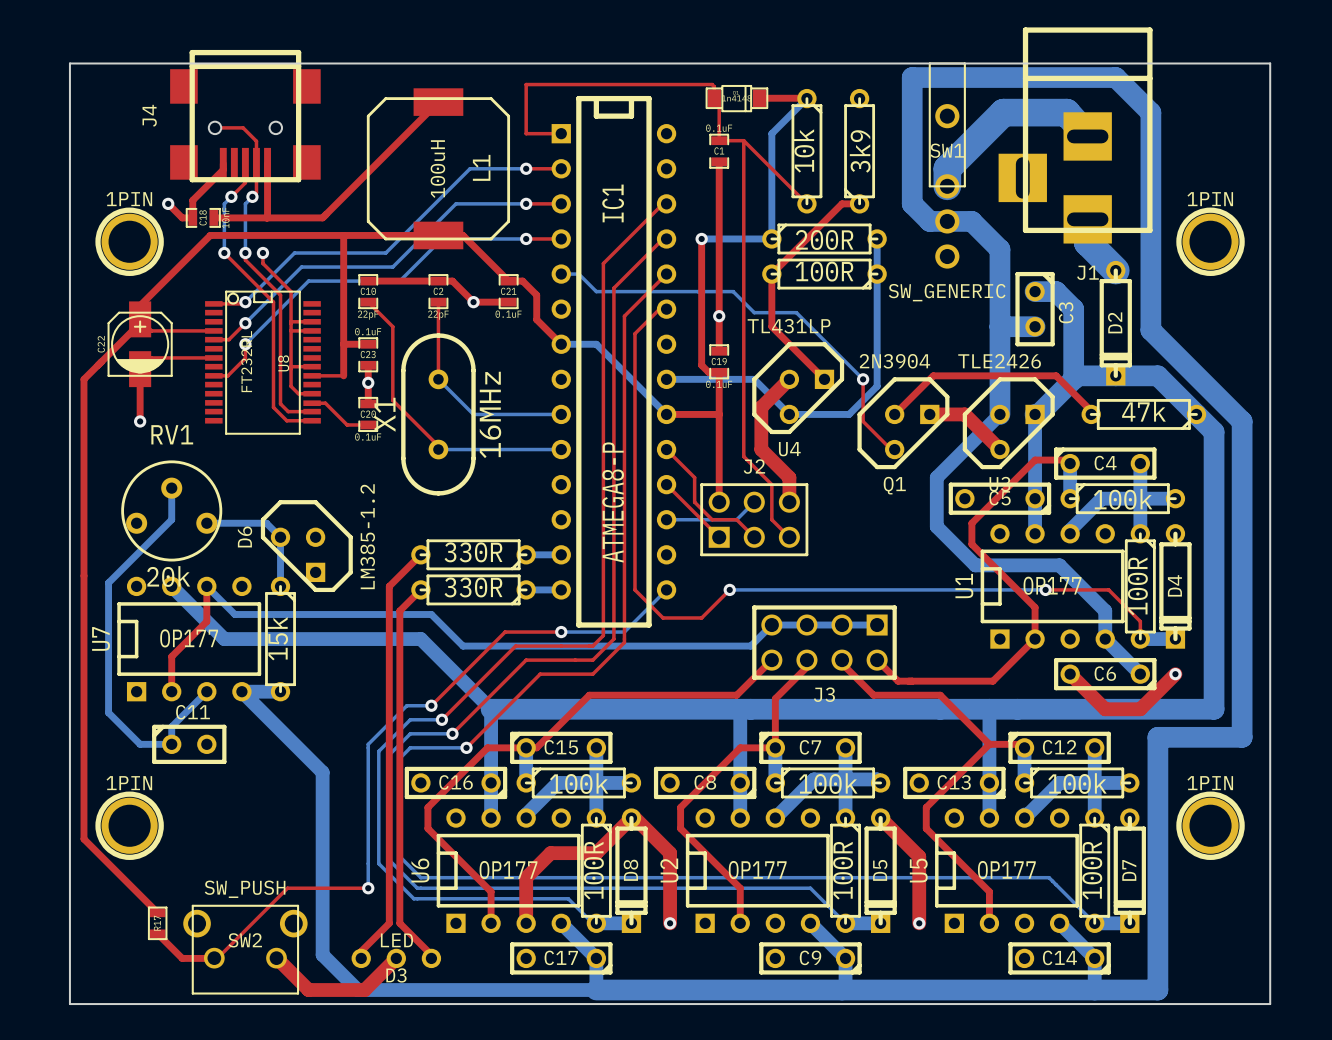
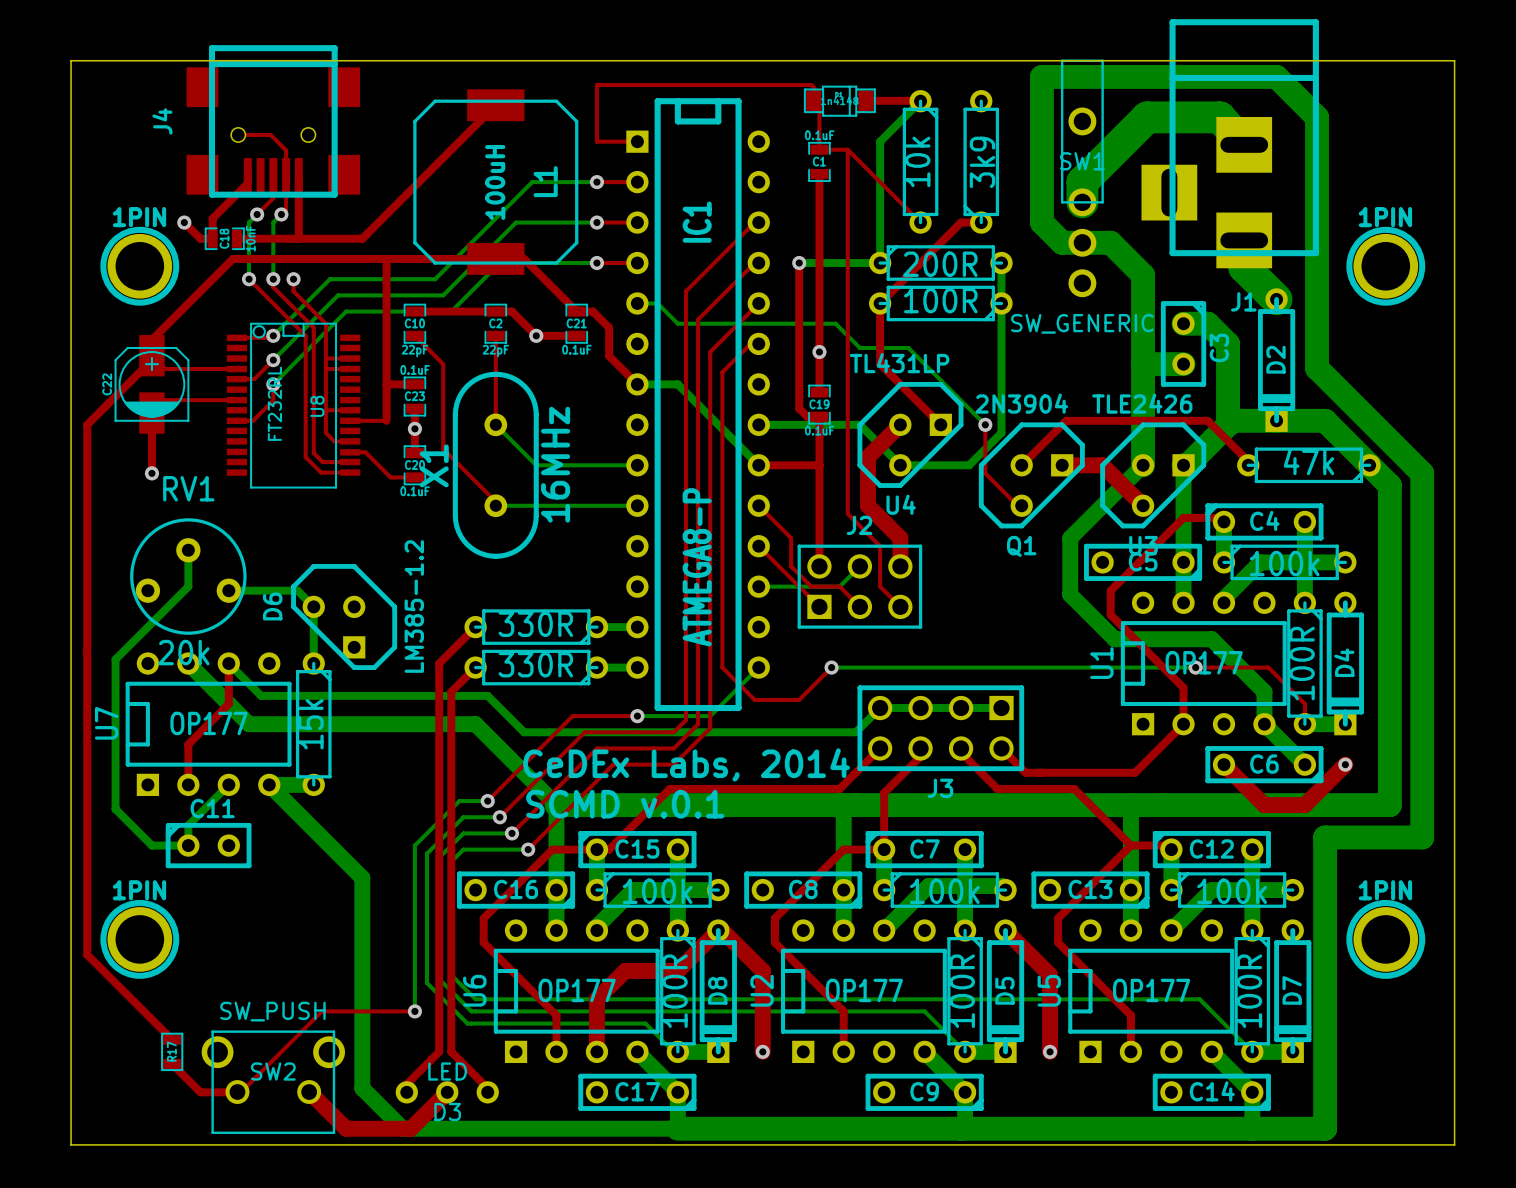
text: none -> CeDEx Labs, 2014 (686, 764)
text: none -> SCMD v.0.1 (625, 804)

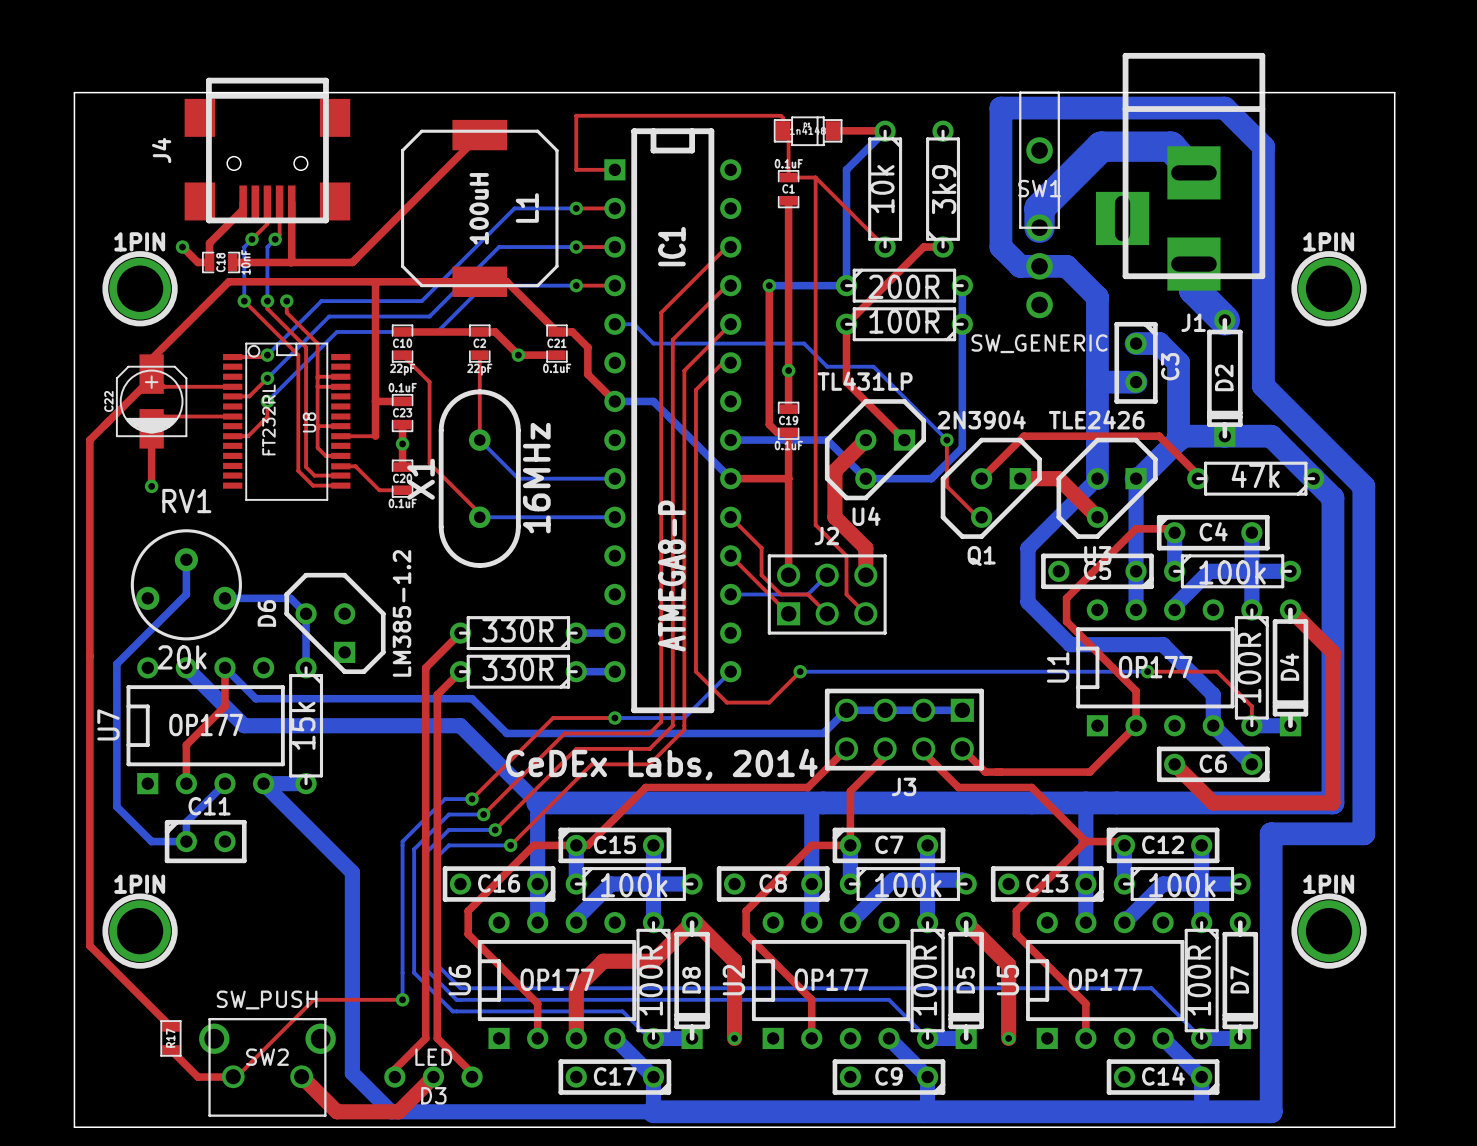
top track: (238, 134) (270, 134) (286, 150) (286, 176) -> none
top track: (1345, 764) (1304, 805) -> (1290, 609) (1332, 652) (1332, 802) (1251, 802)
via: (1345, 764) -> none
text: SCMD v.0.1 (625, 804) -> none

